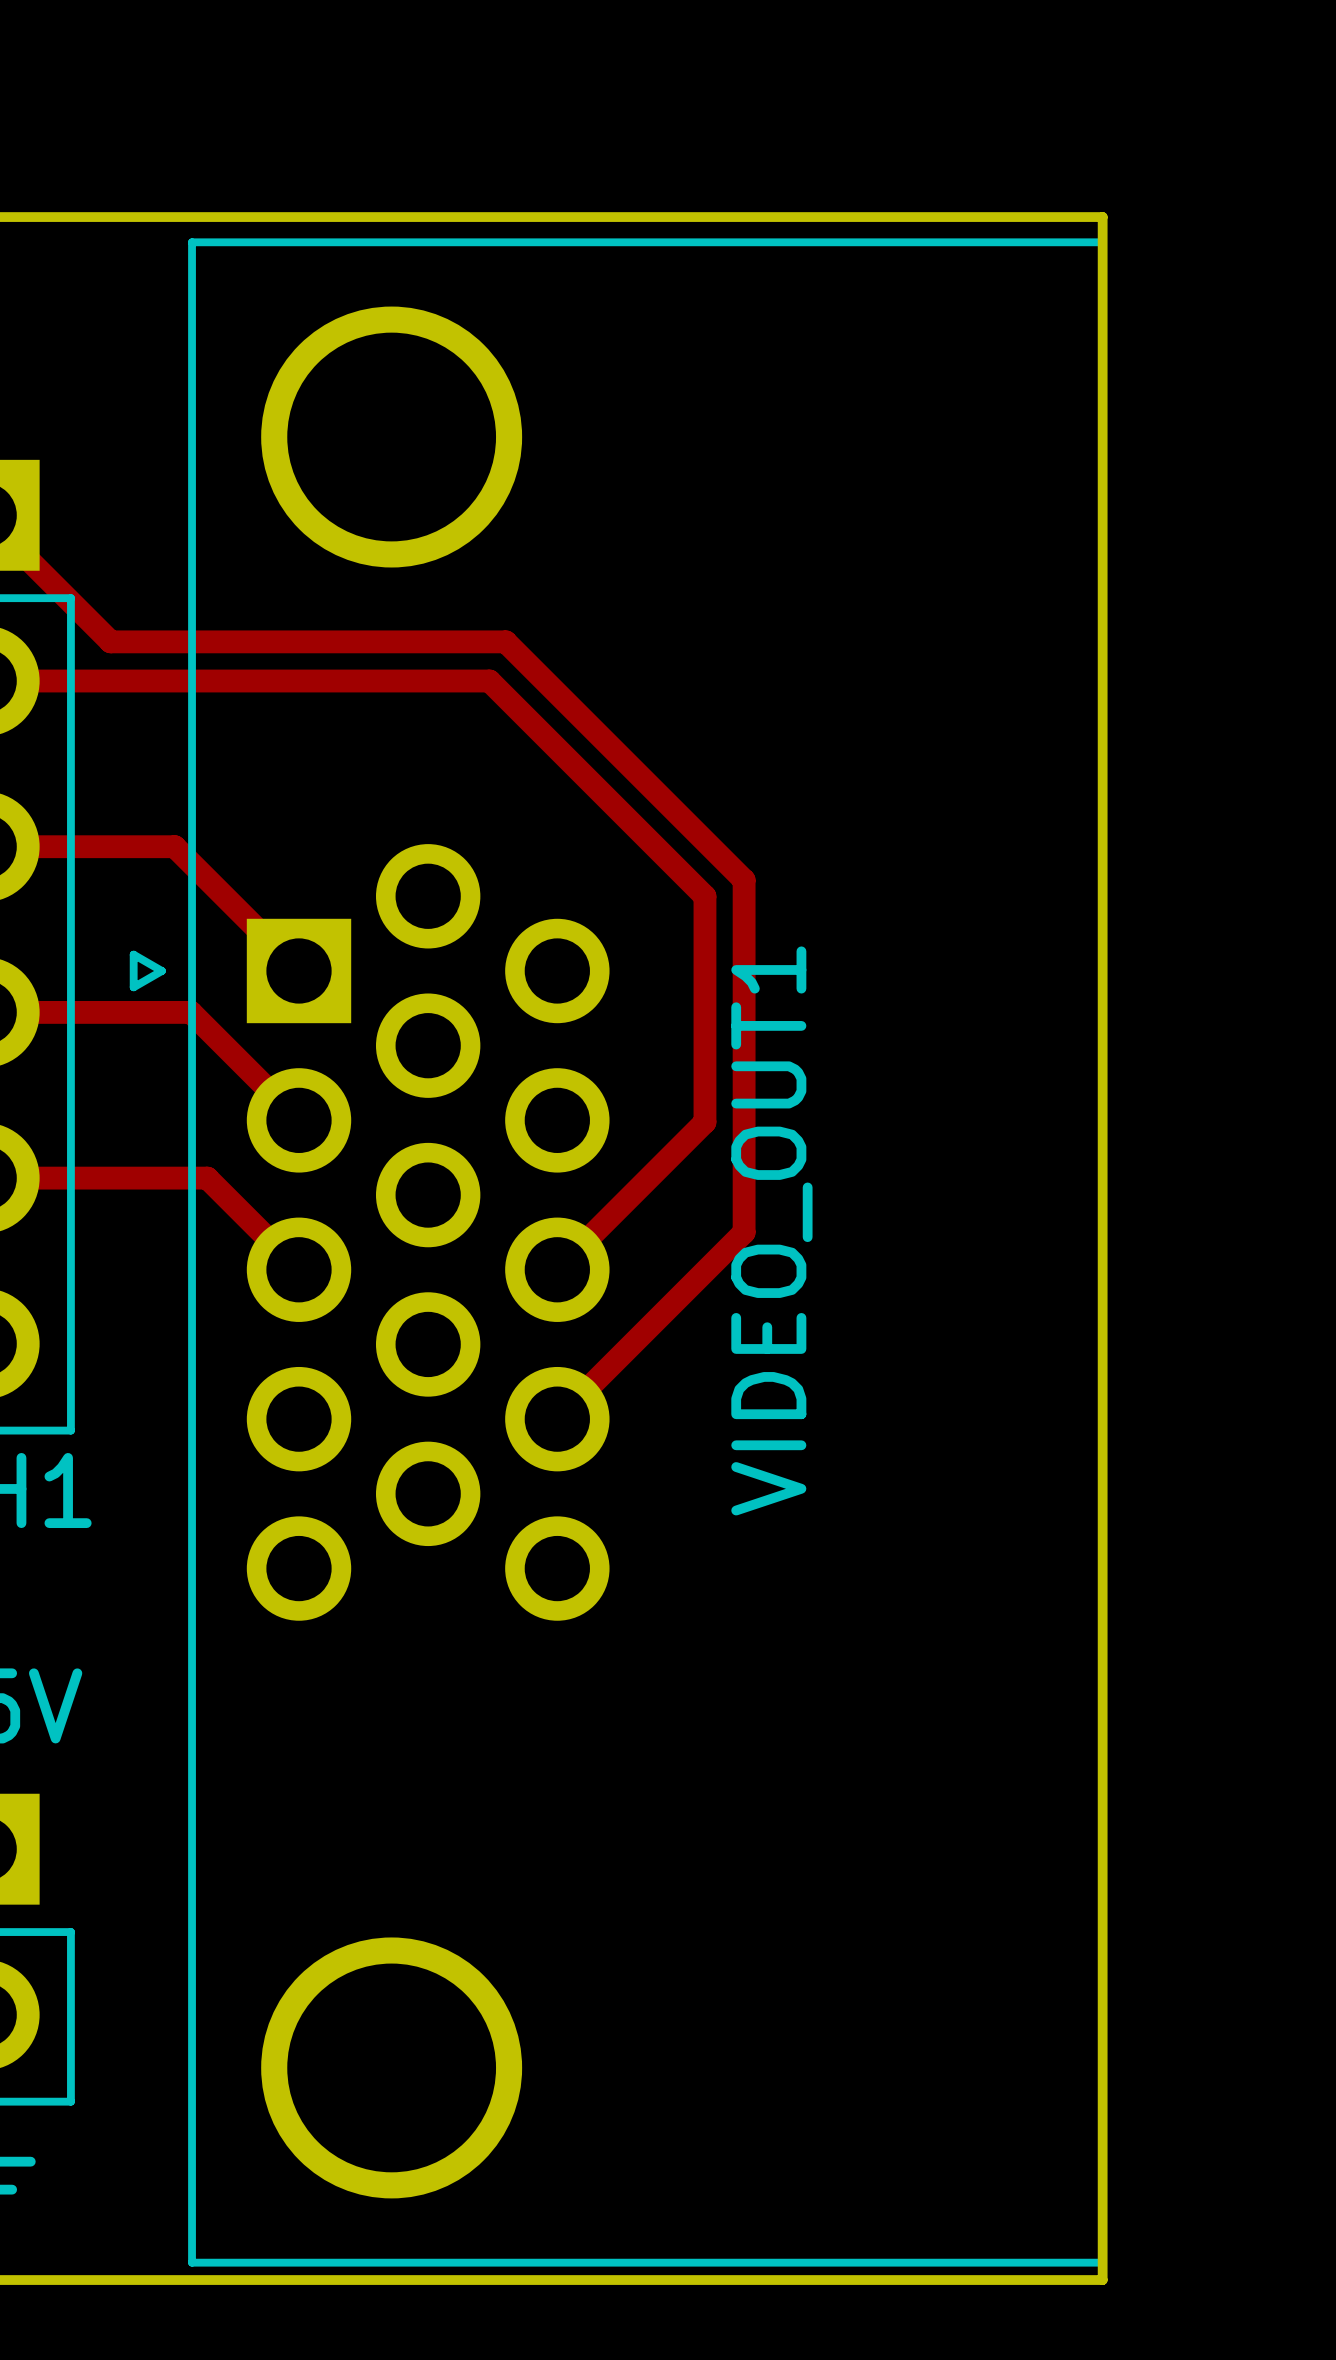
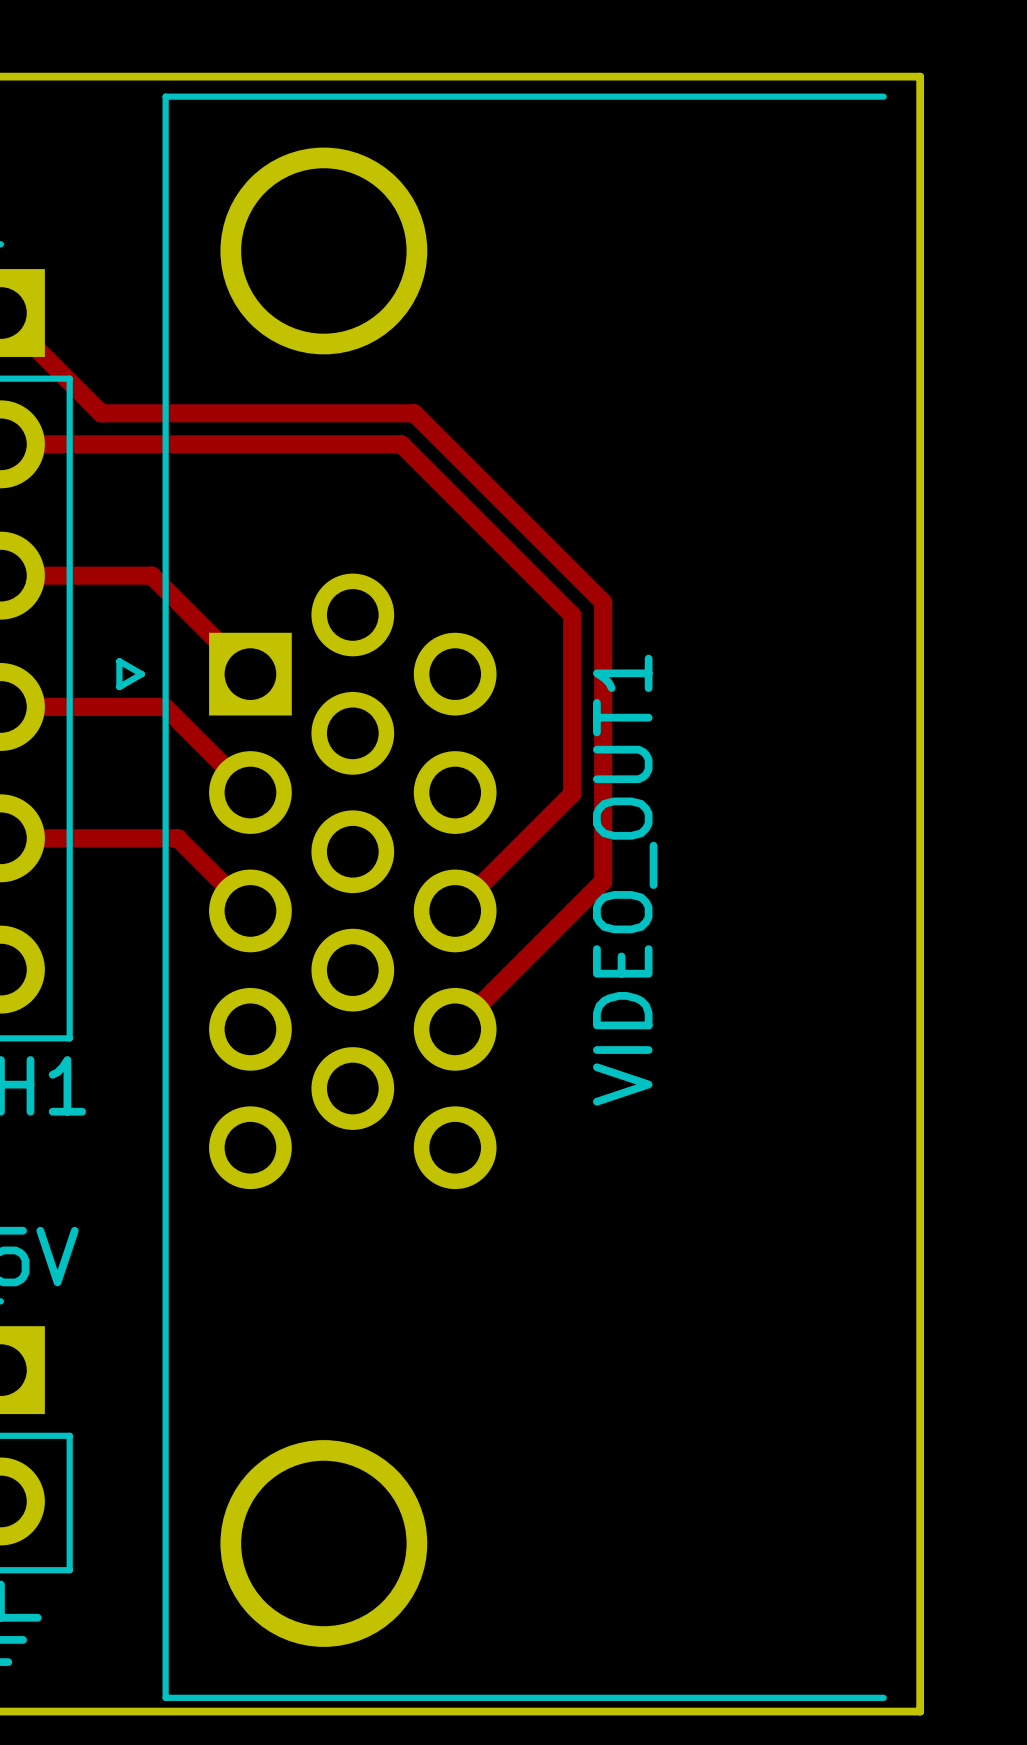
board edge: (1102, 217) (1102, 2280) -> (887, 76) (920, 76) (920, 1711) (887, 1711)

